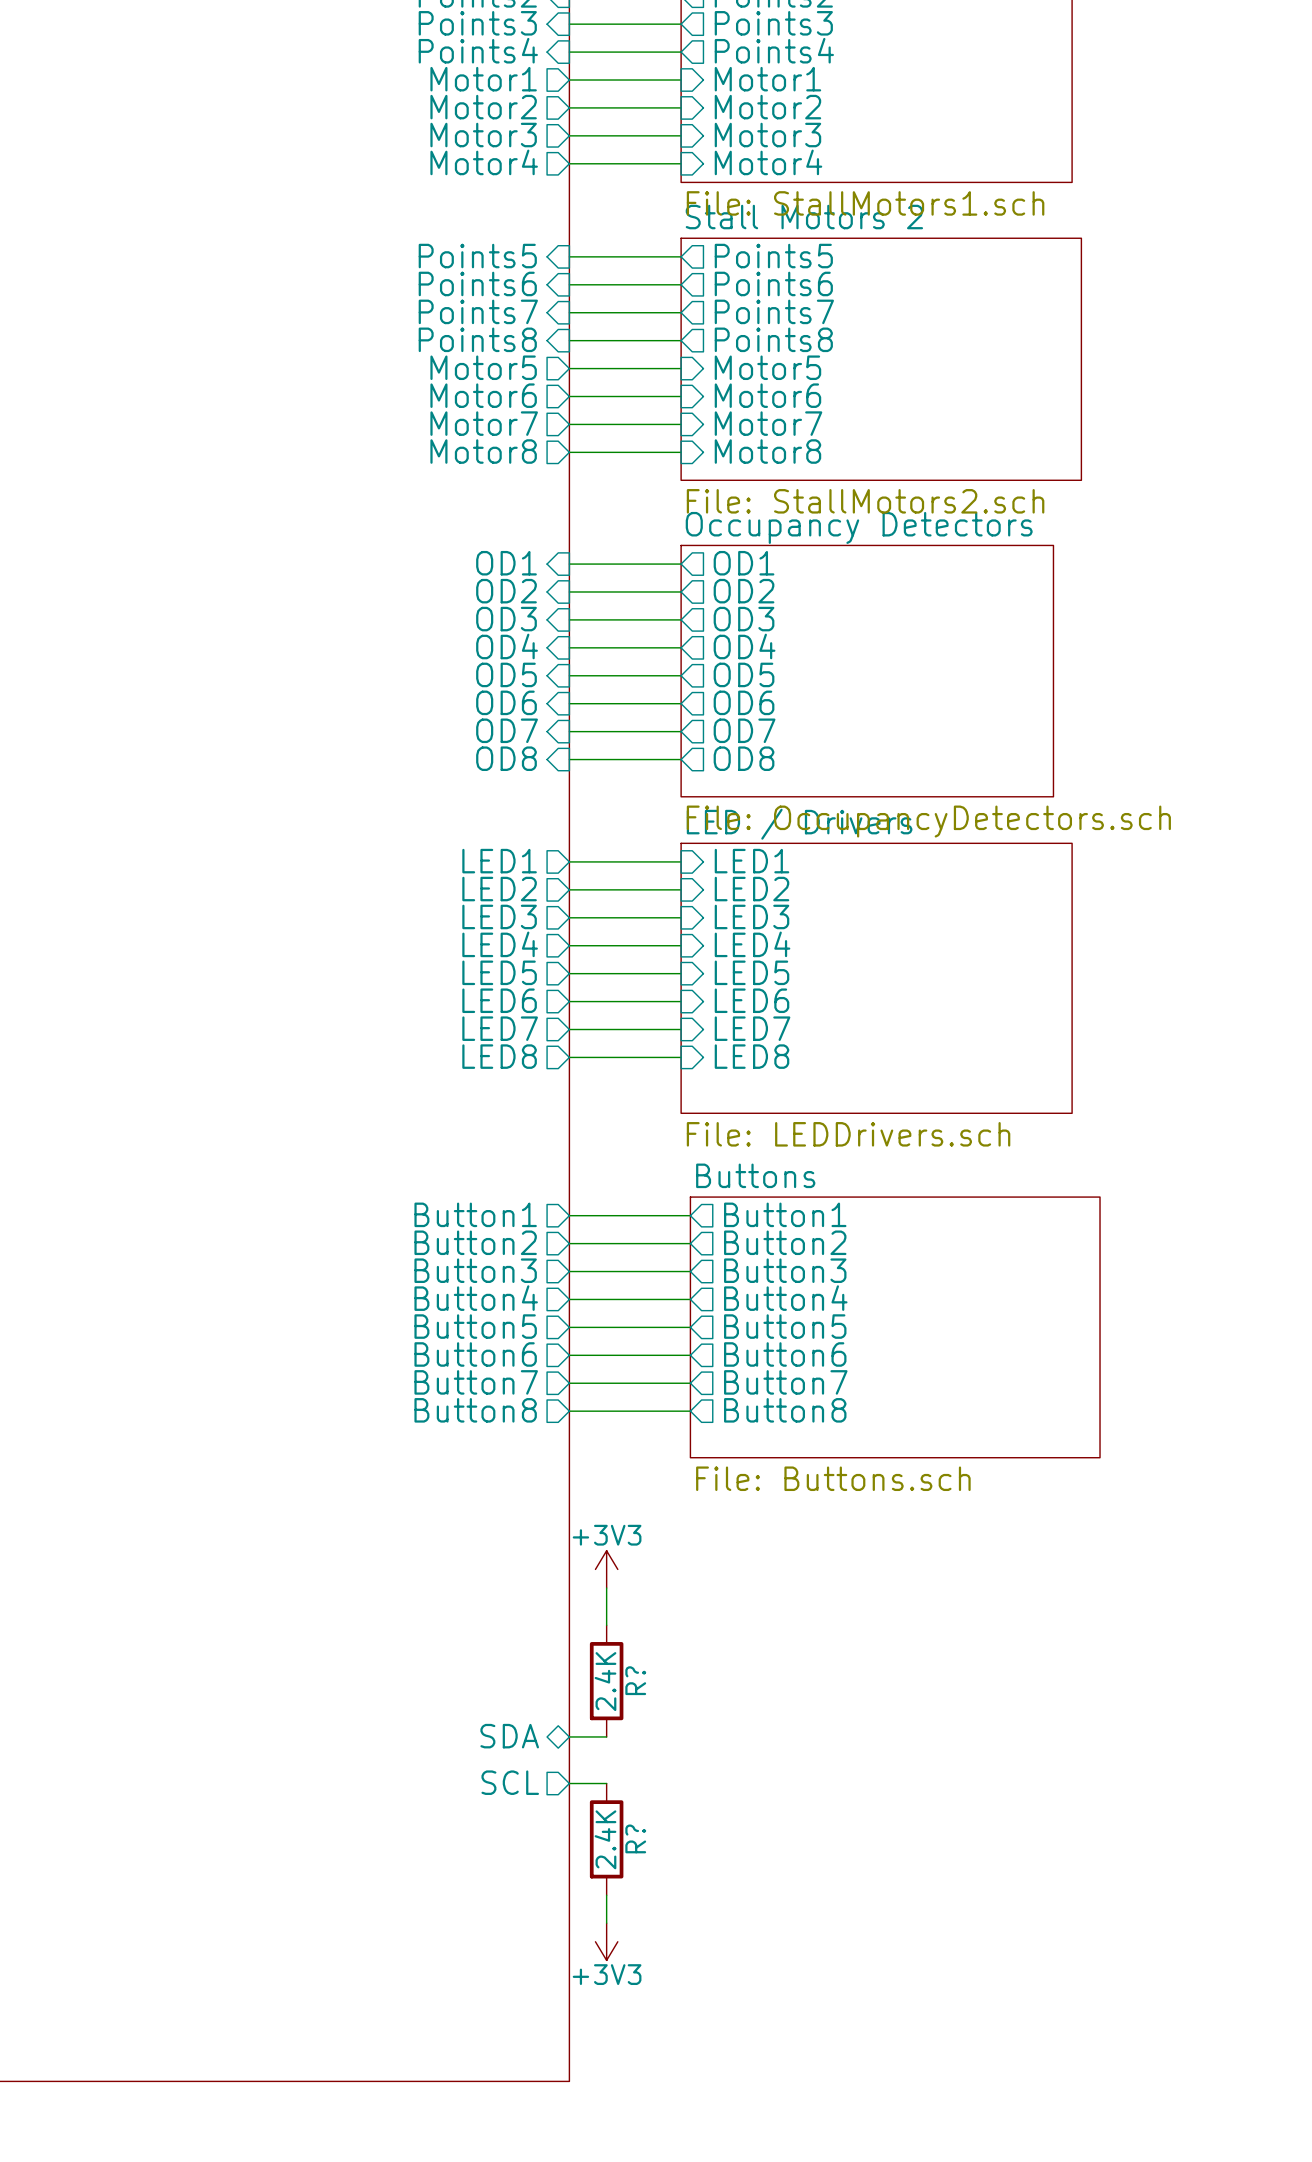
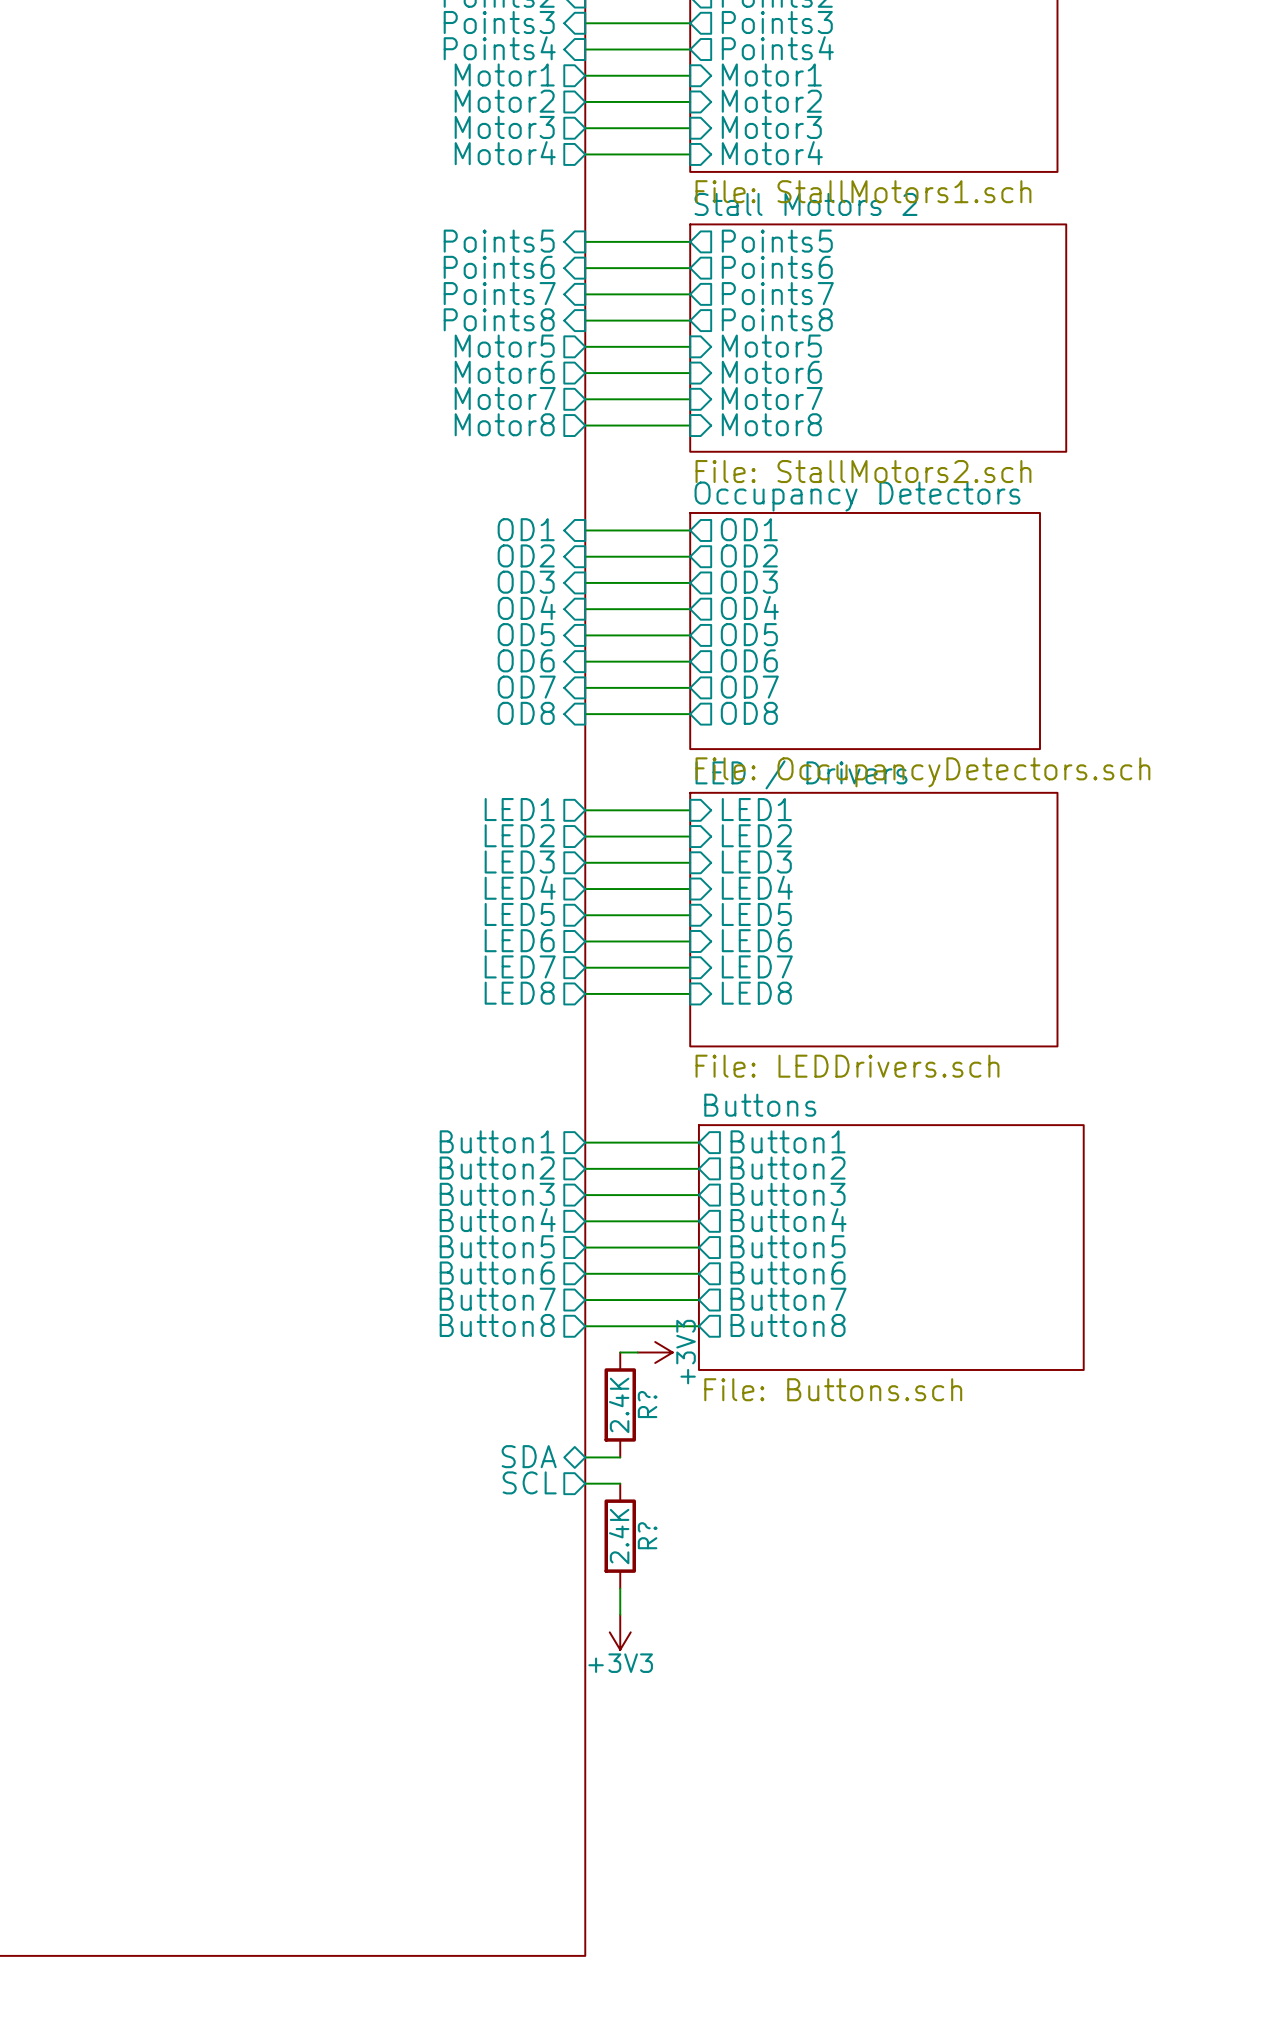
wire: none -> (620, 1352) (637, 1352)
power symbol: none -> +3V3 (655, 1352)
R?: none -> 2.4K (620, 1404)
power symbol: +3V3 (606, 1569) -> none
wire: (606, 1588) (606, 1625) -> none
R? position: (606, 1681) -> (620, 1536)
sheet pin position: SDA (509, 1736) -> SDA (529, 1456)
wire: (569, 1736) (606, 1736) -> (585, 1457) (620, 1457)
power symbol: none -> +3V3 (620, 1632)
sheet pin position: SCL (510, 1782) -> SCL (529, 1482)
wire: (569, 1783) (606, 1783) -> (585, 1483) (620, 1483)
R?: 2.4K (606, 1839) -> none
wire: (606, 1895) (606, 1923) -> (620, 1588) (620, 1614)
power symbol: +3V3 (606, 1941) -> none

